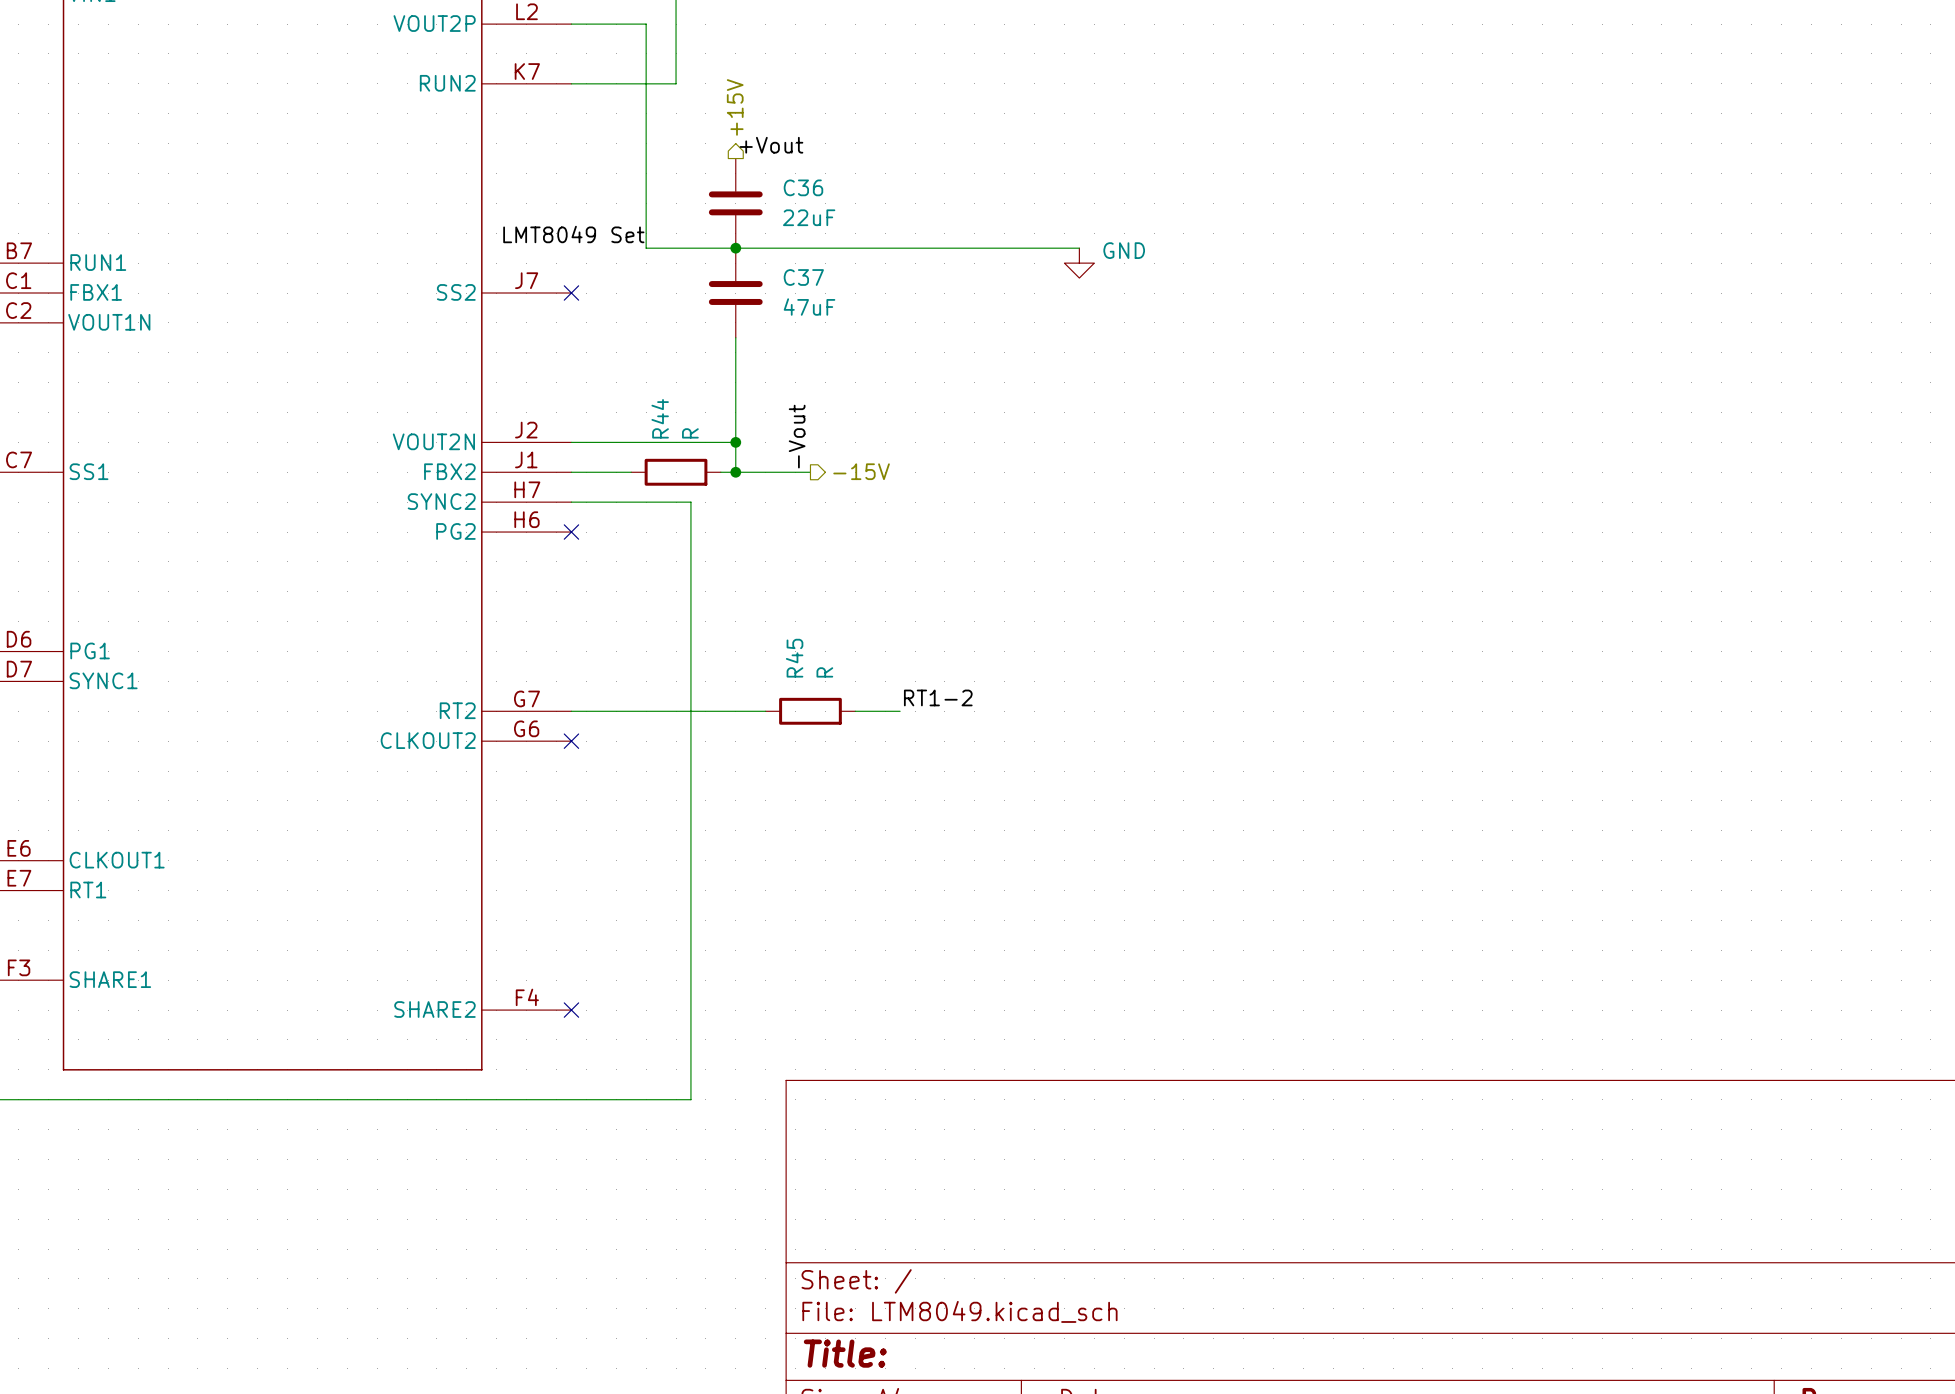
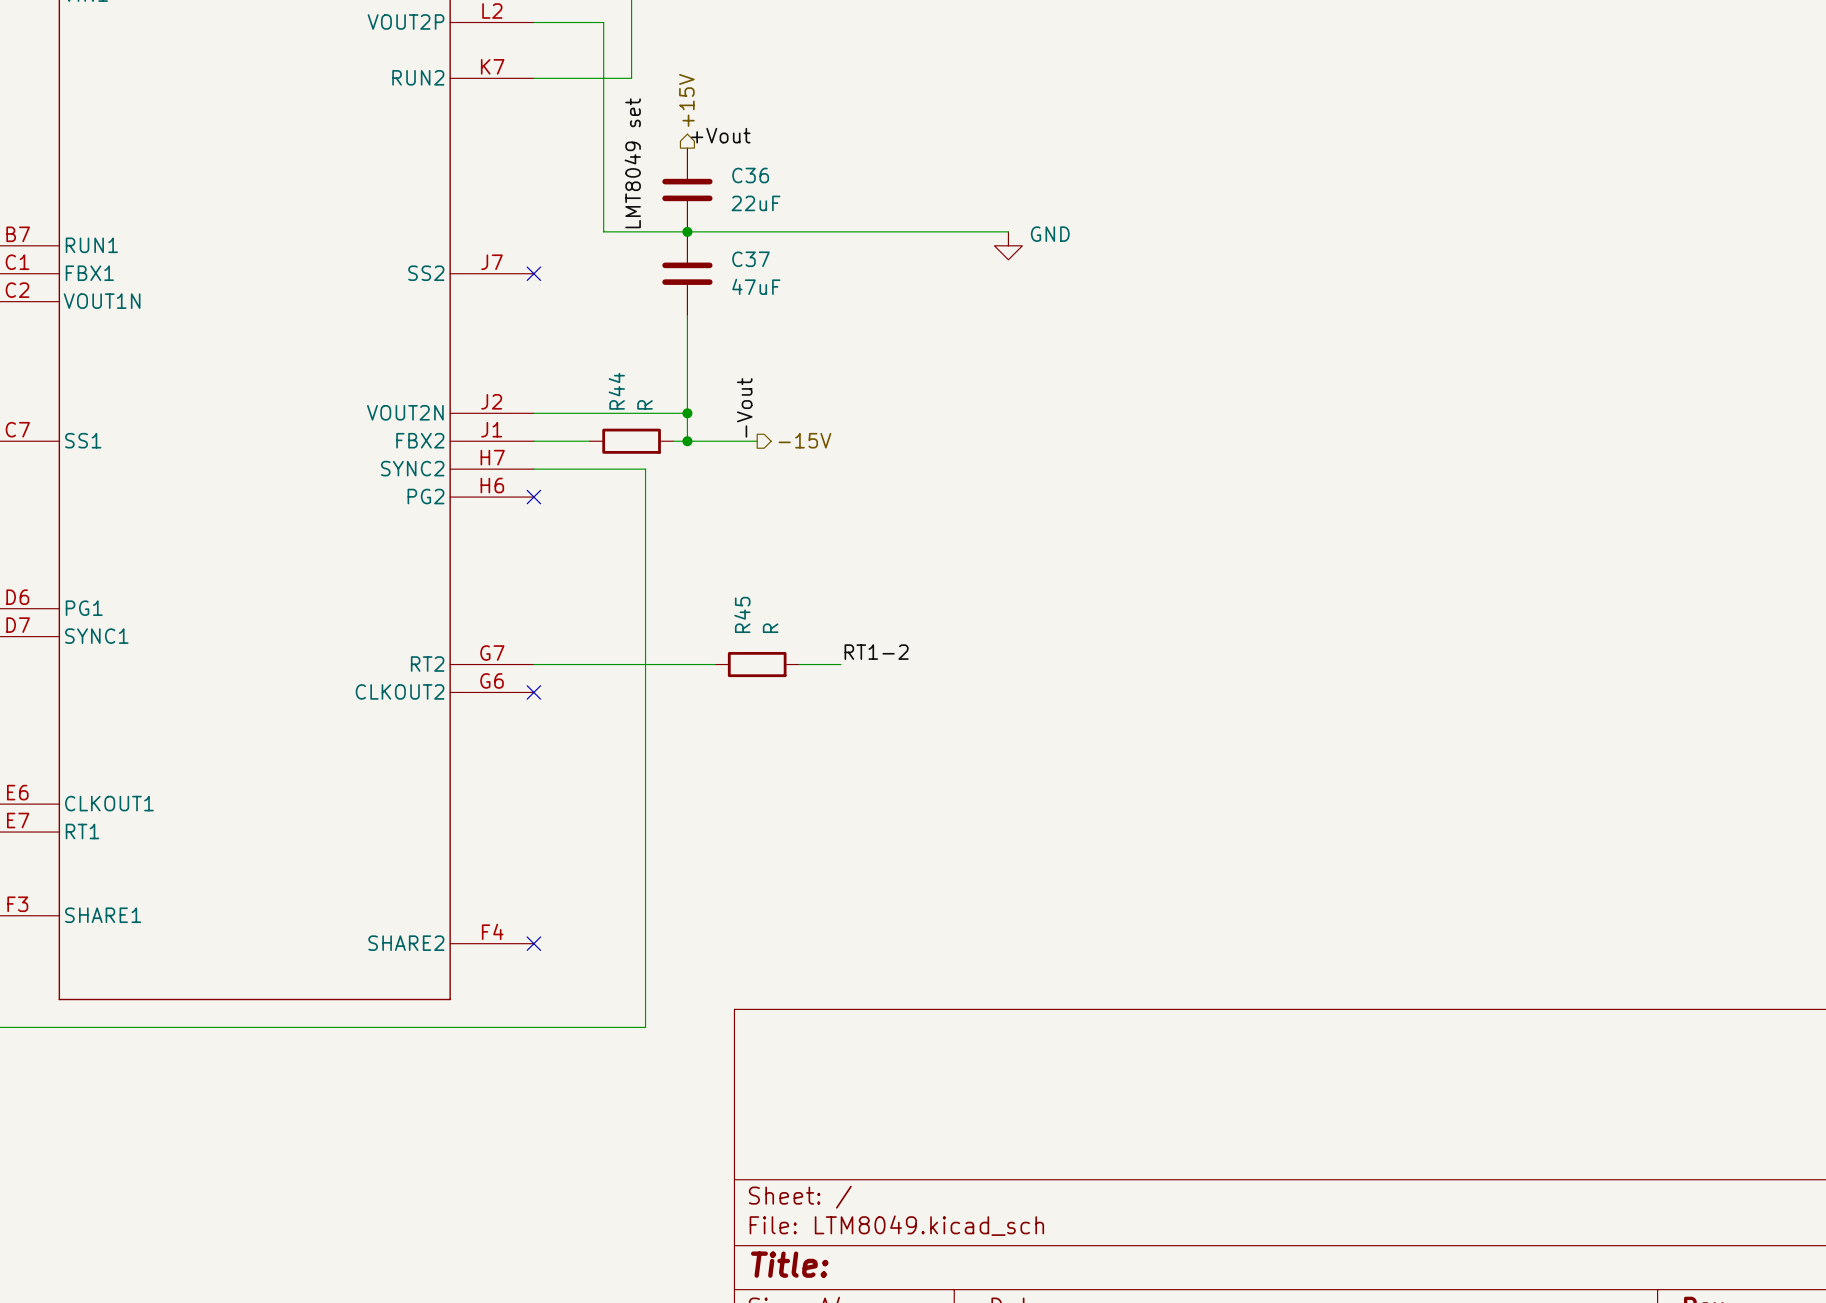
label: none -> LMT8049 set (632, 163)
label: LMT8049 Set (573, 234) -> none

